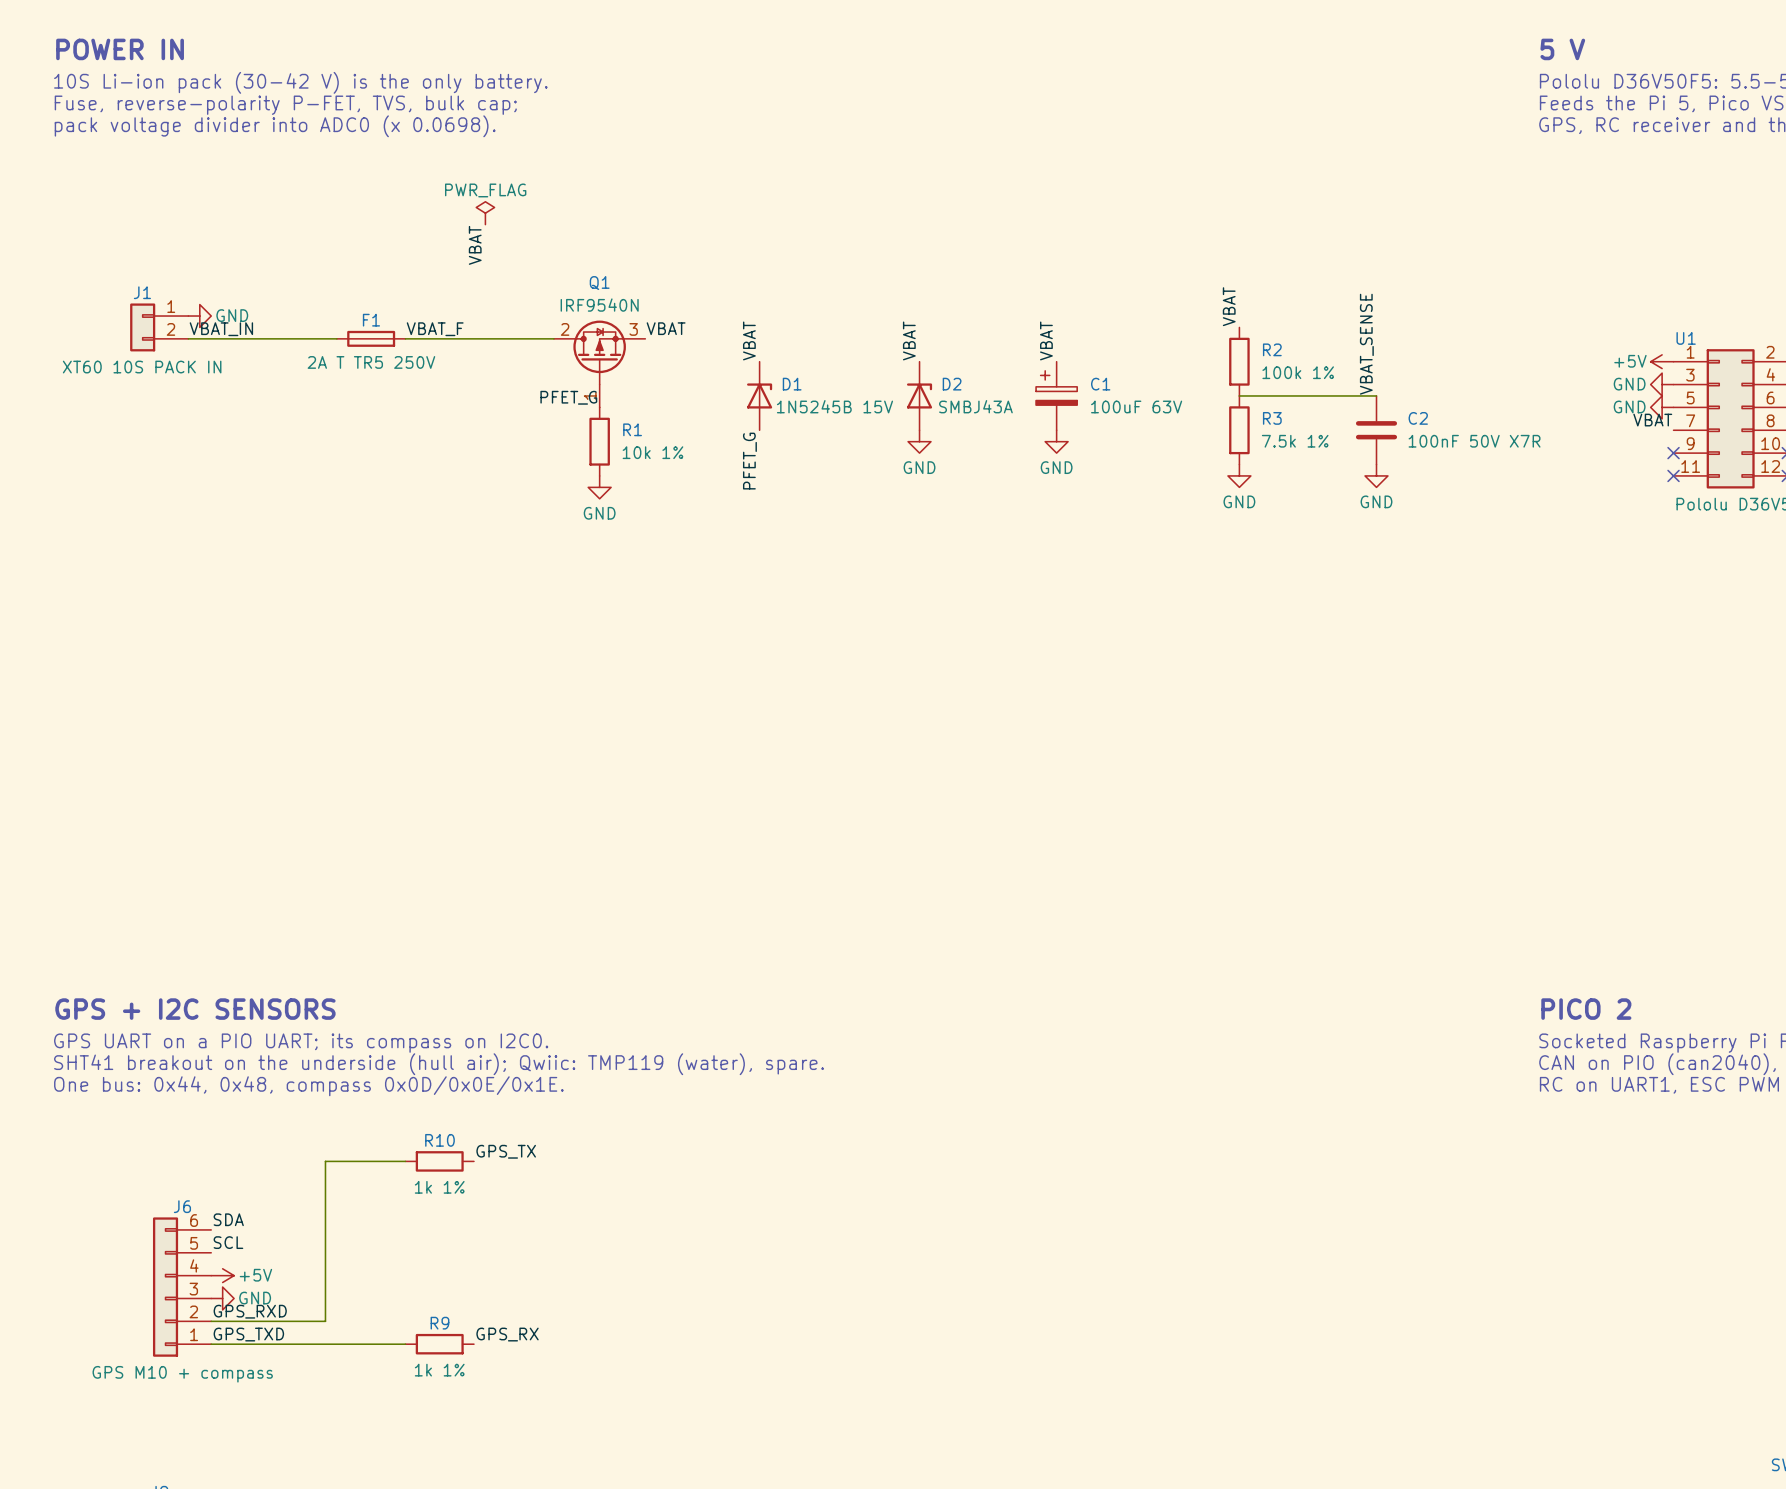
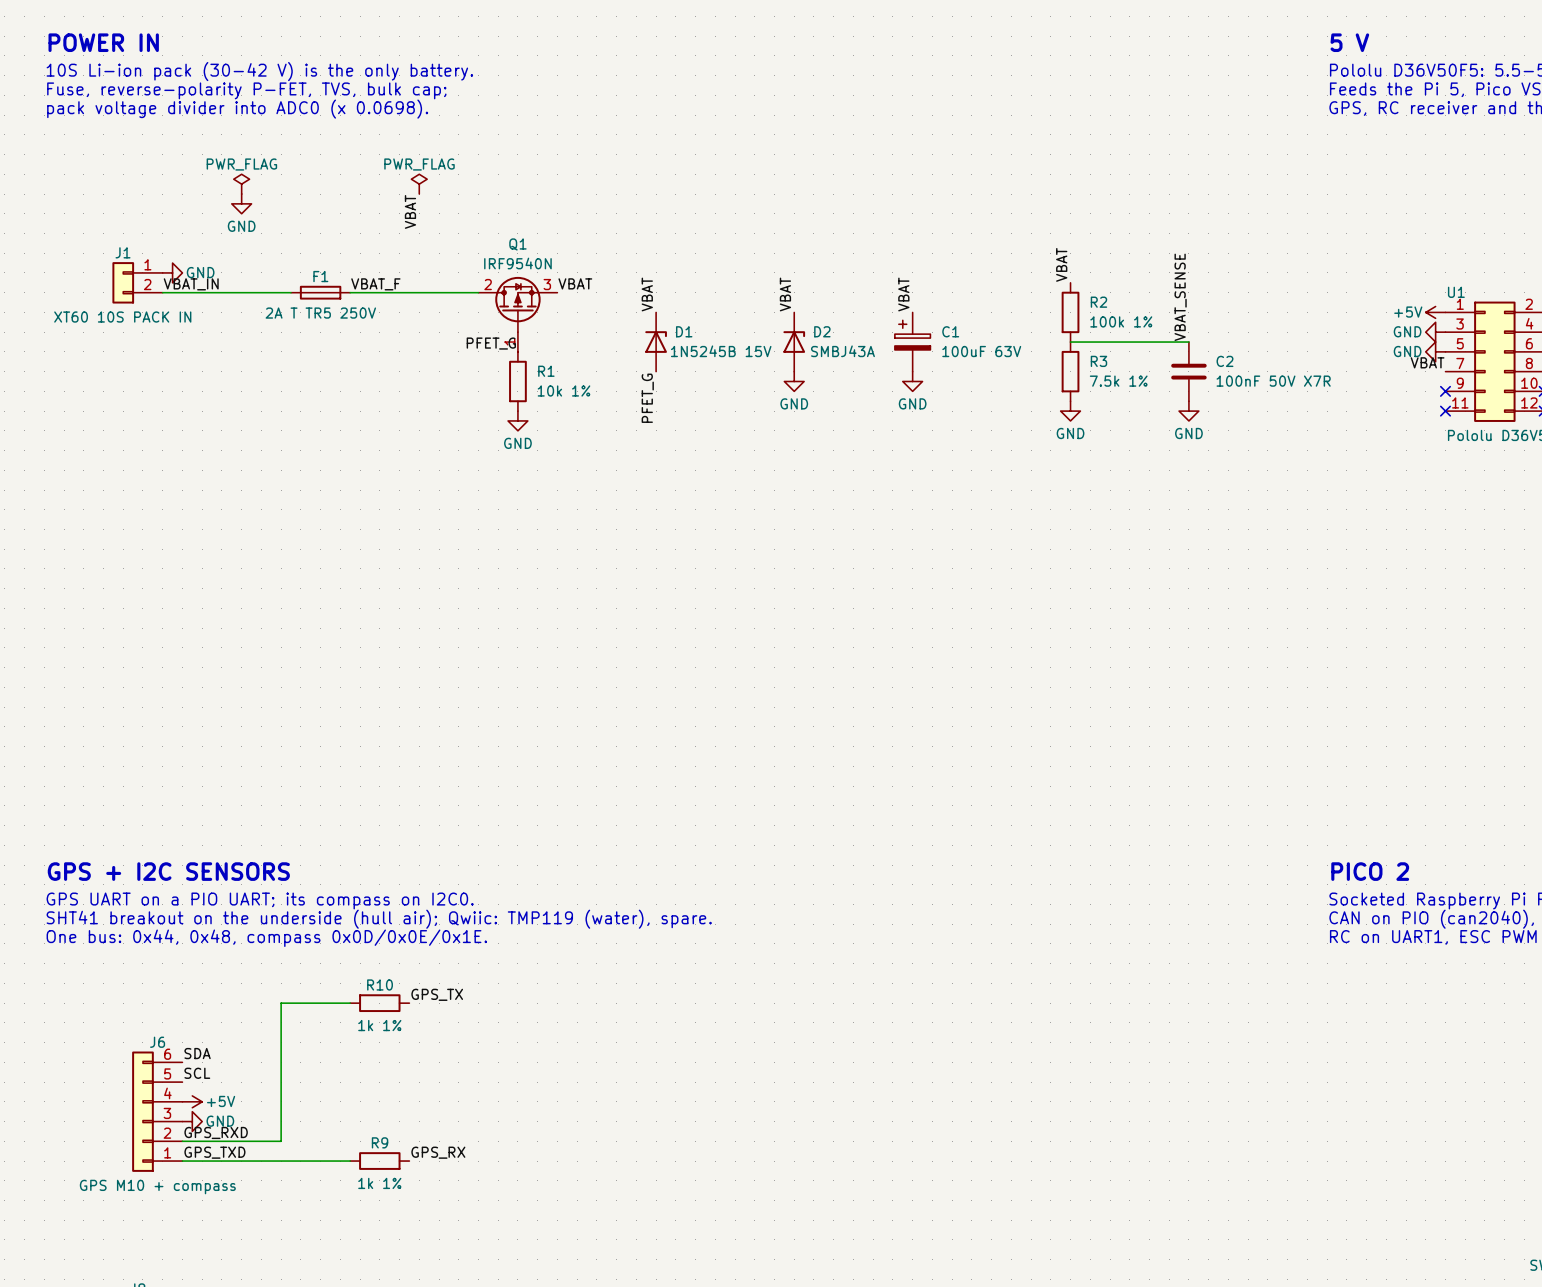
power symbol: none -> PWR_FLAG (241, 184)
power symbol: none -> GND (241, 203)

